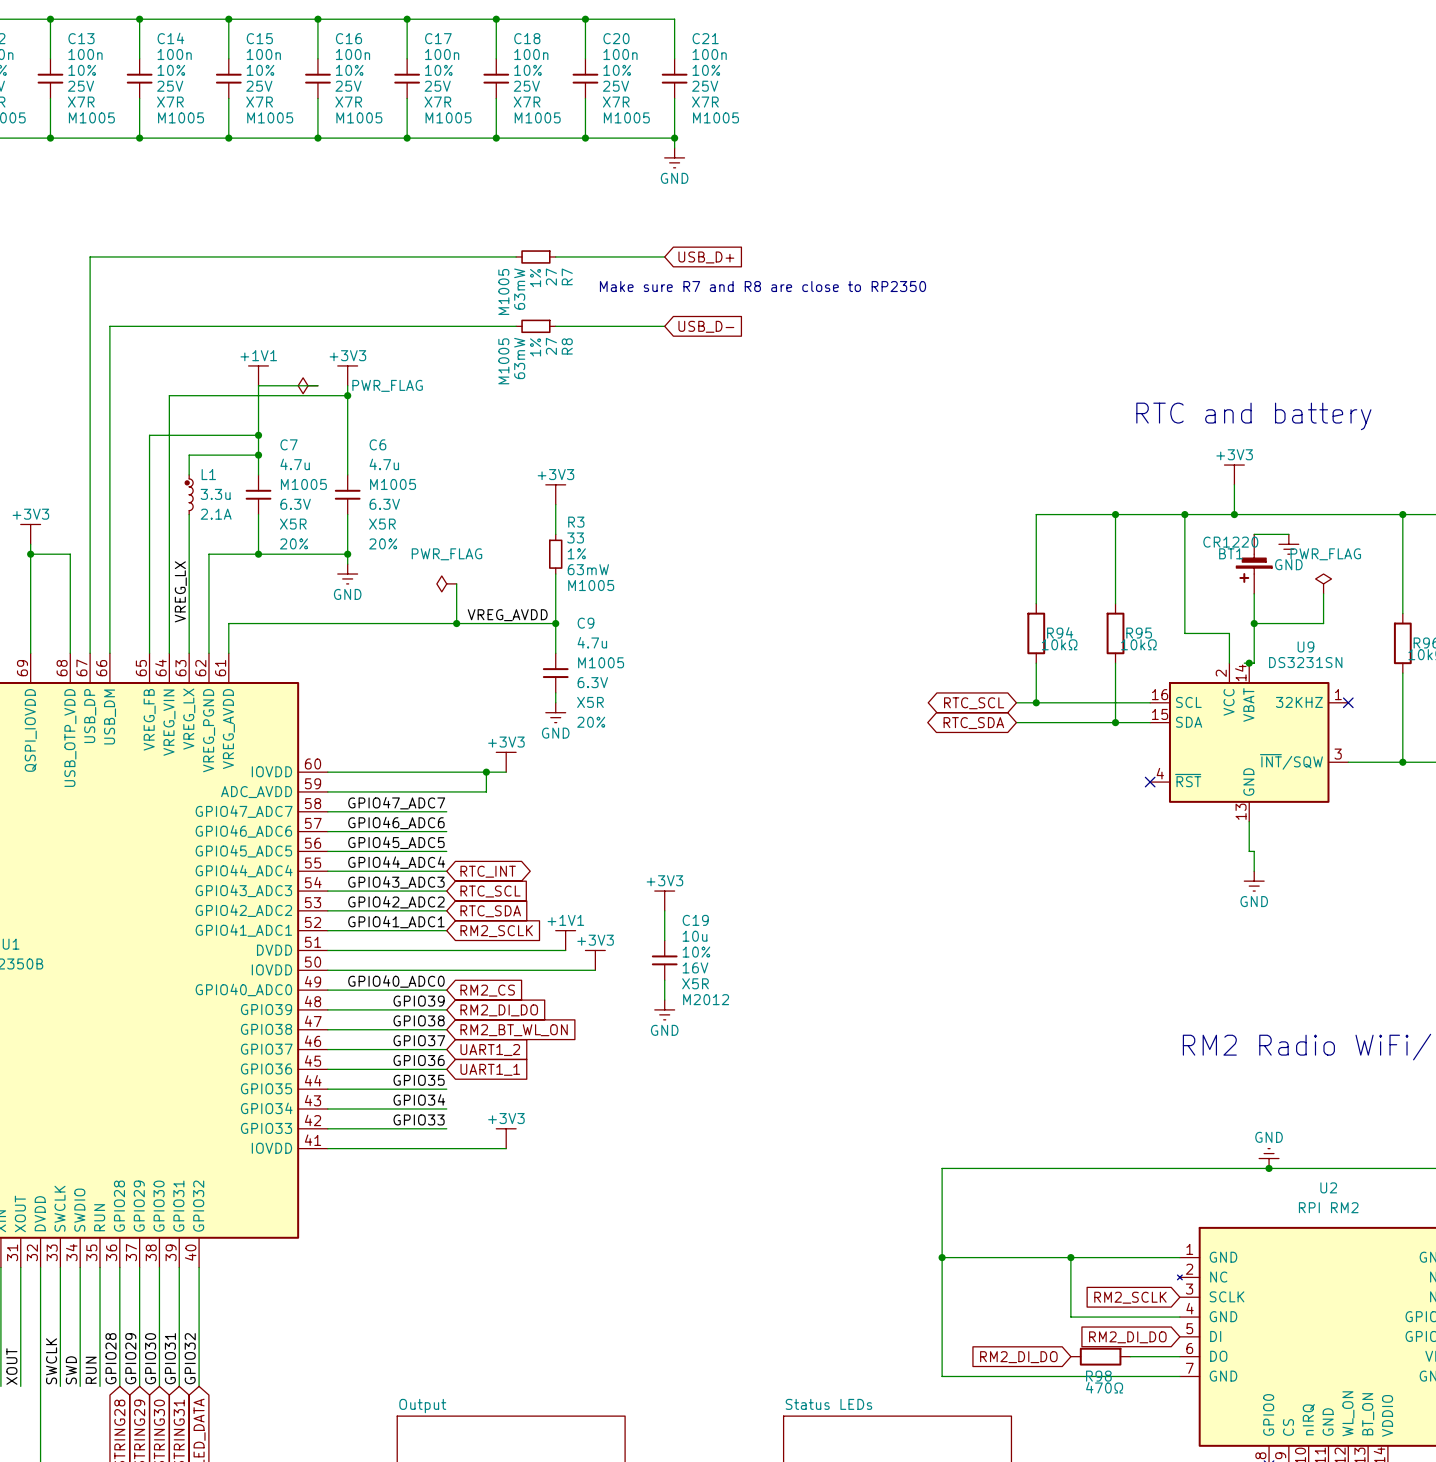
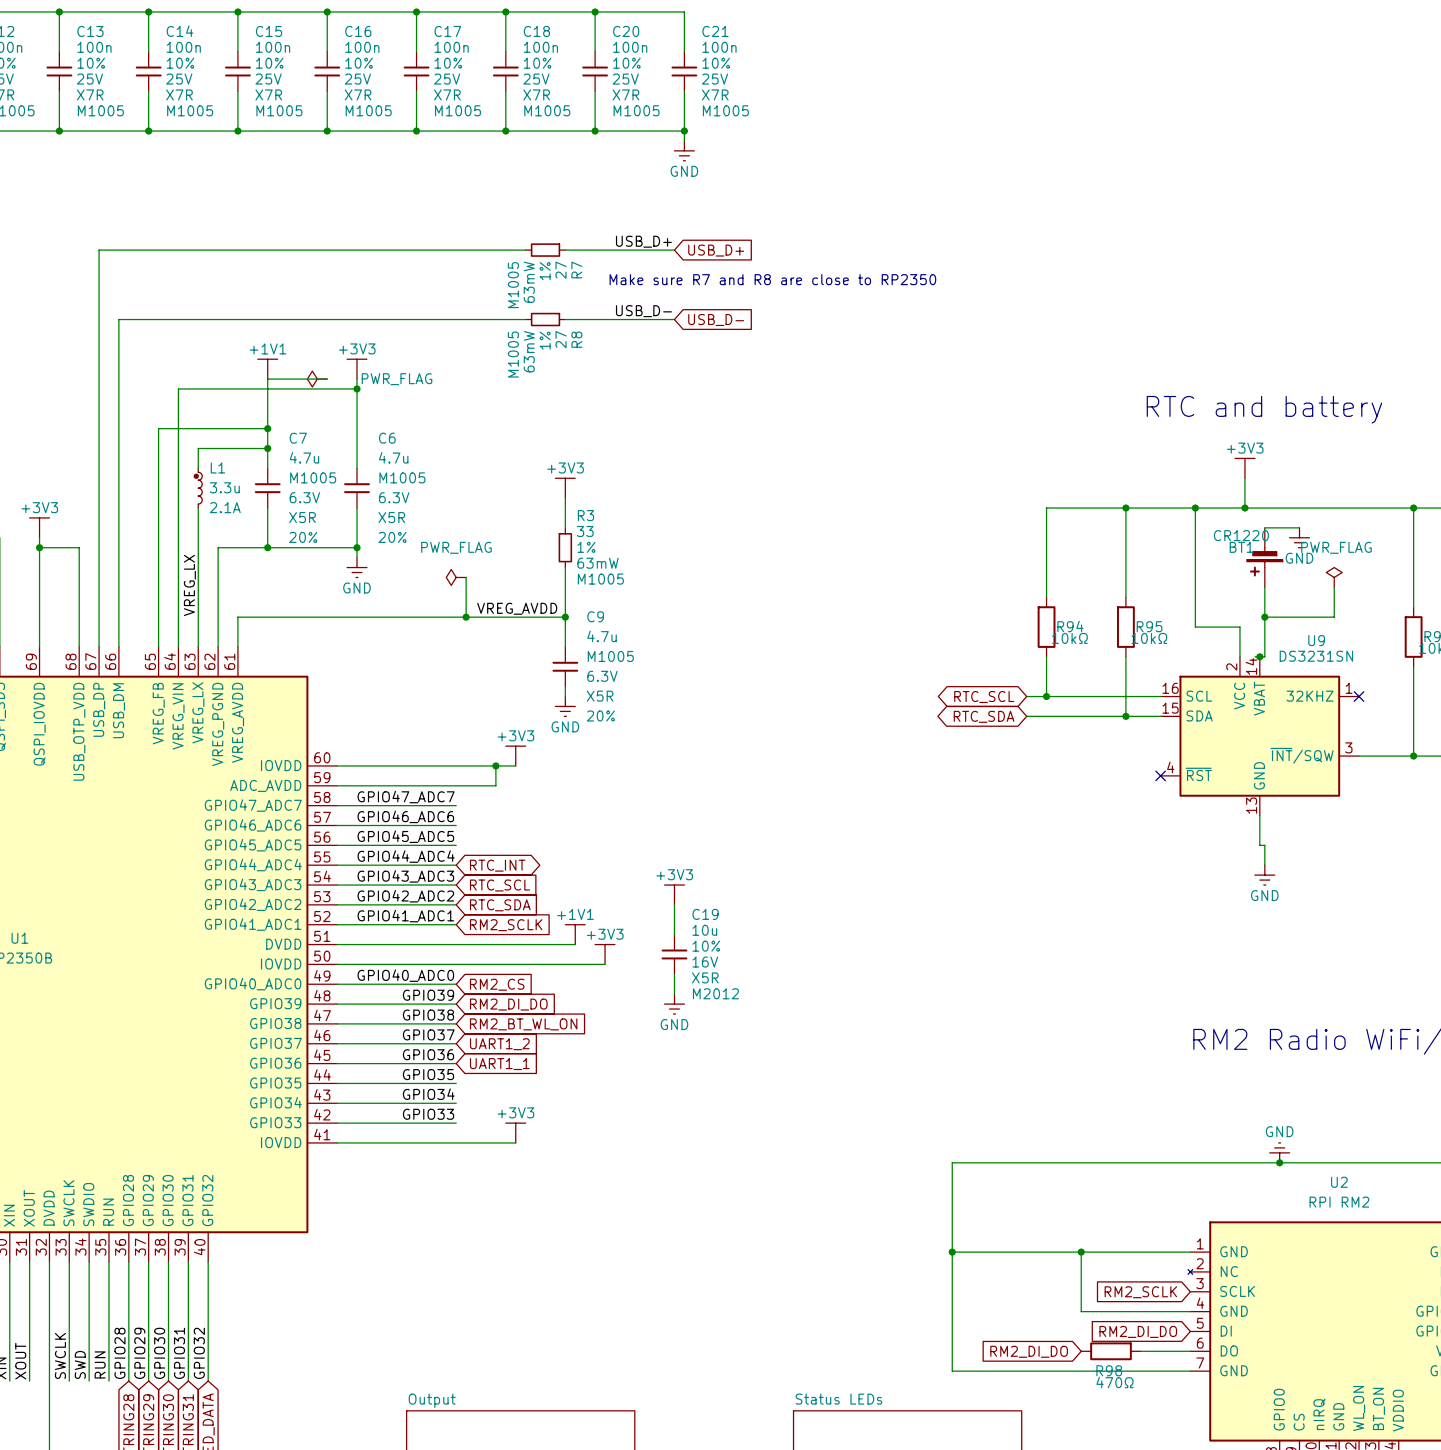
label: none -> USB_D+ (643, 241)
label: none -> USB_D- (643, 311)

